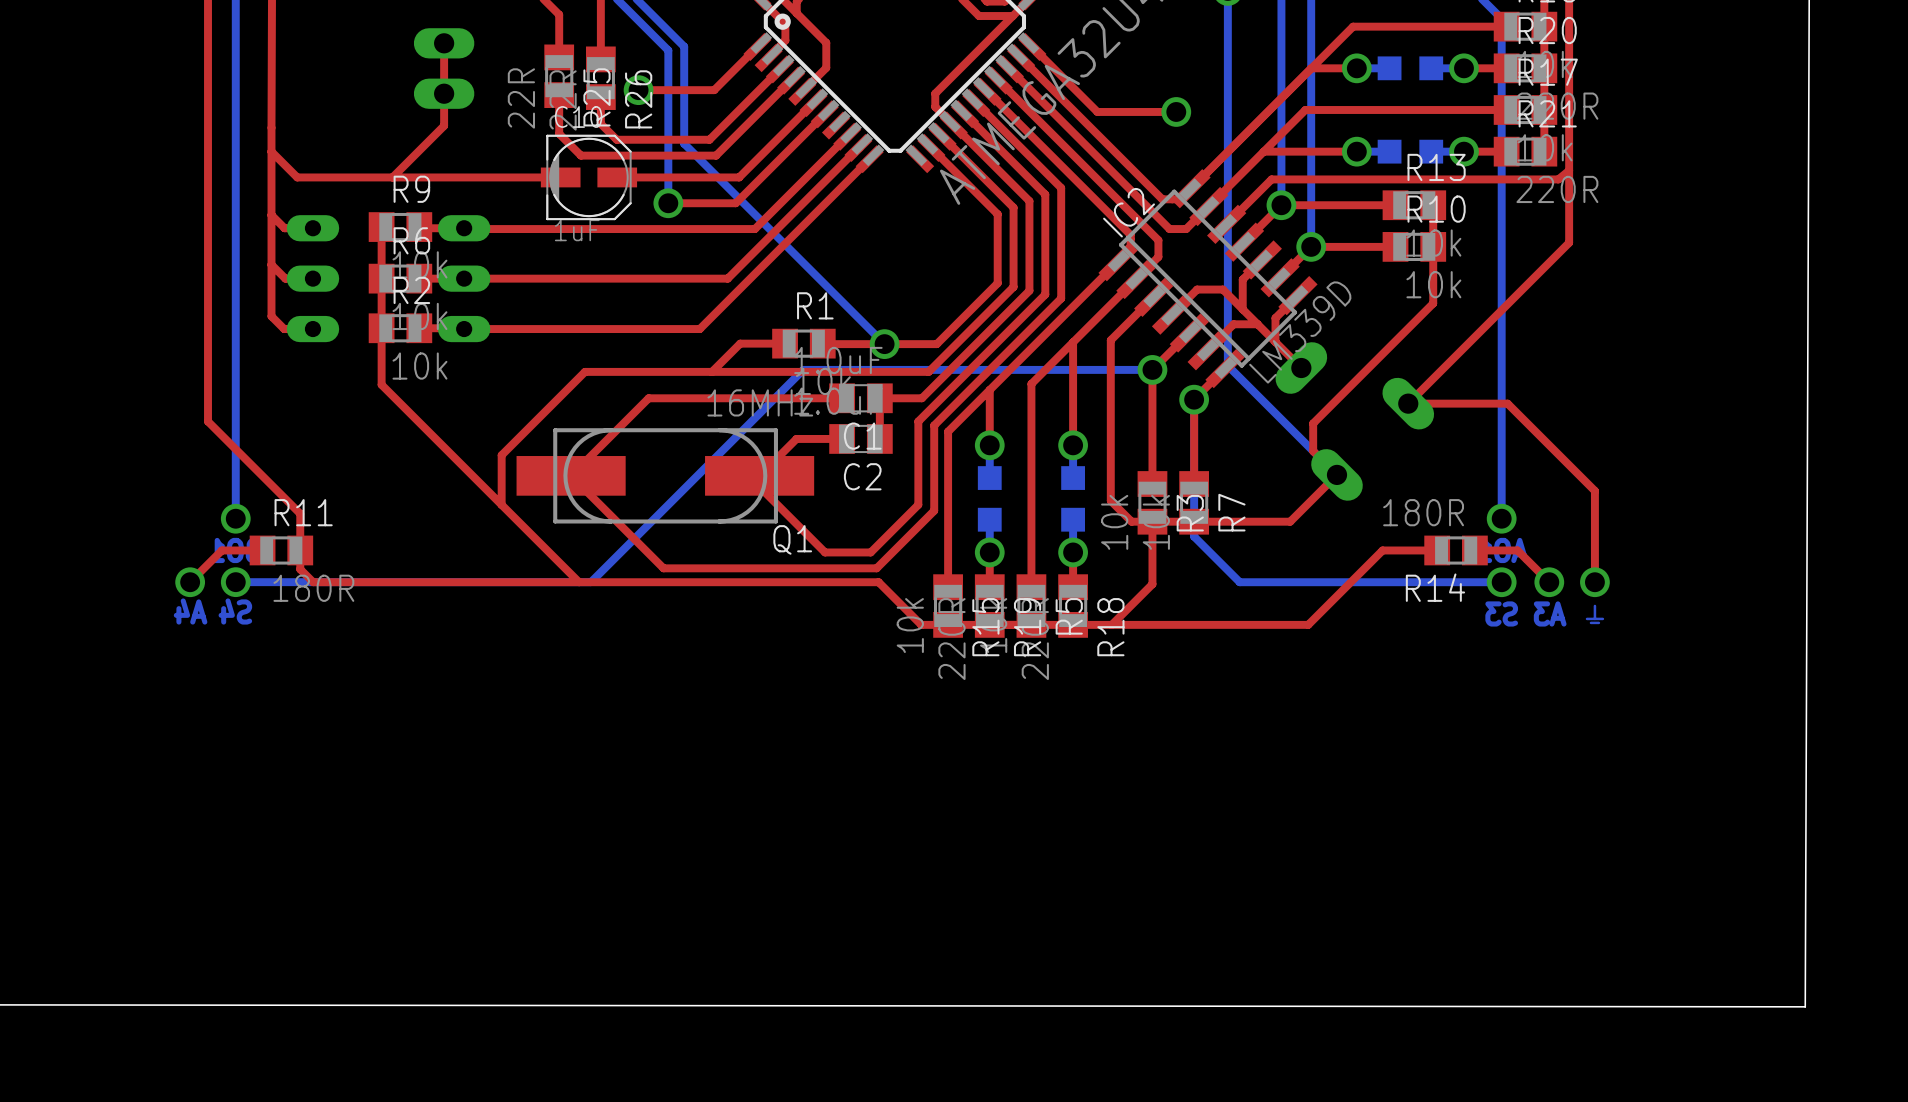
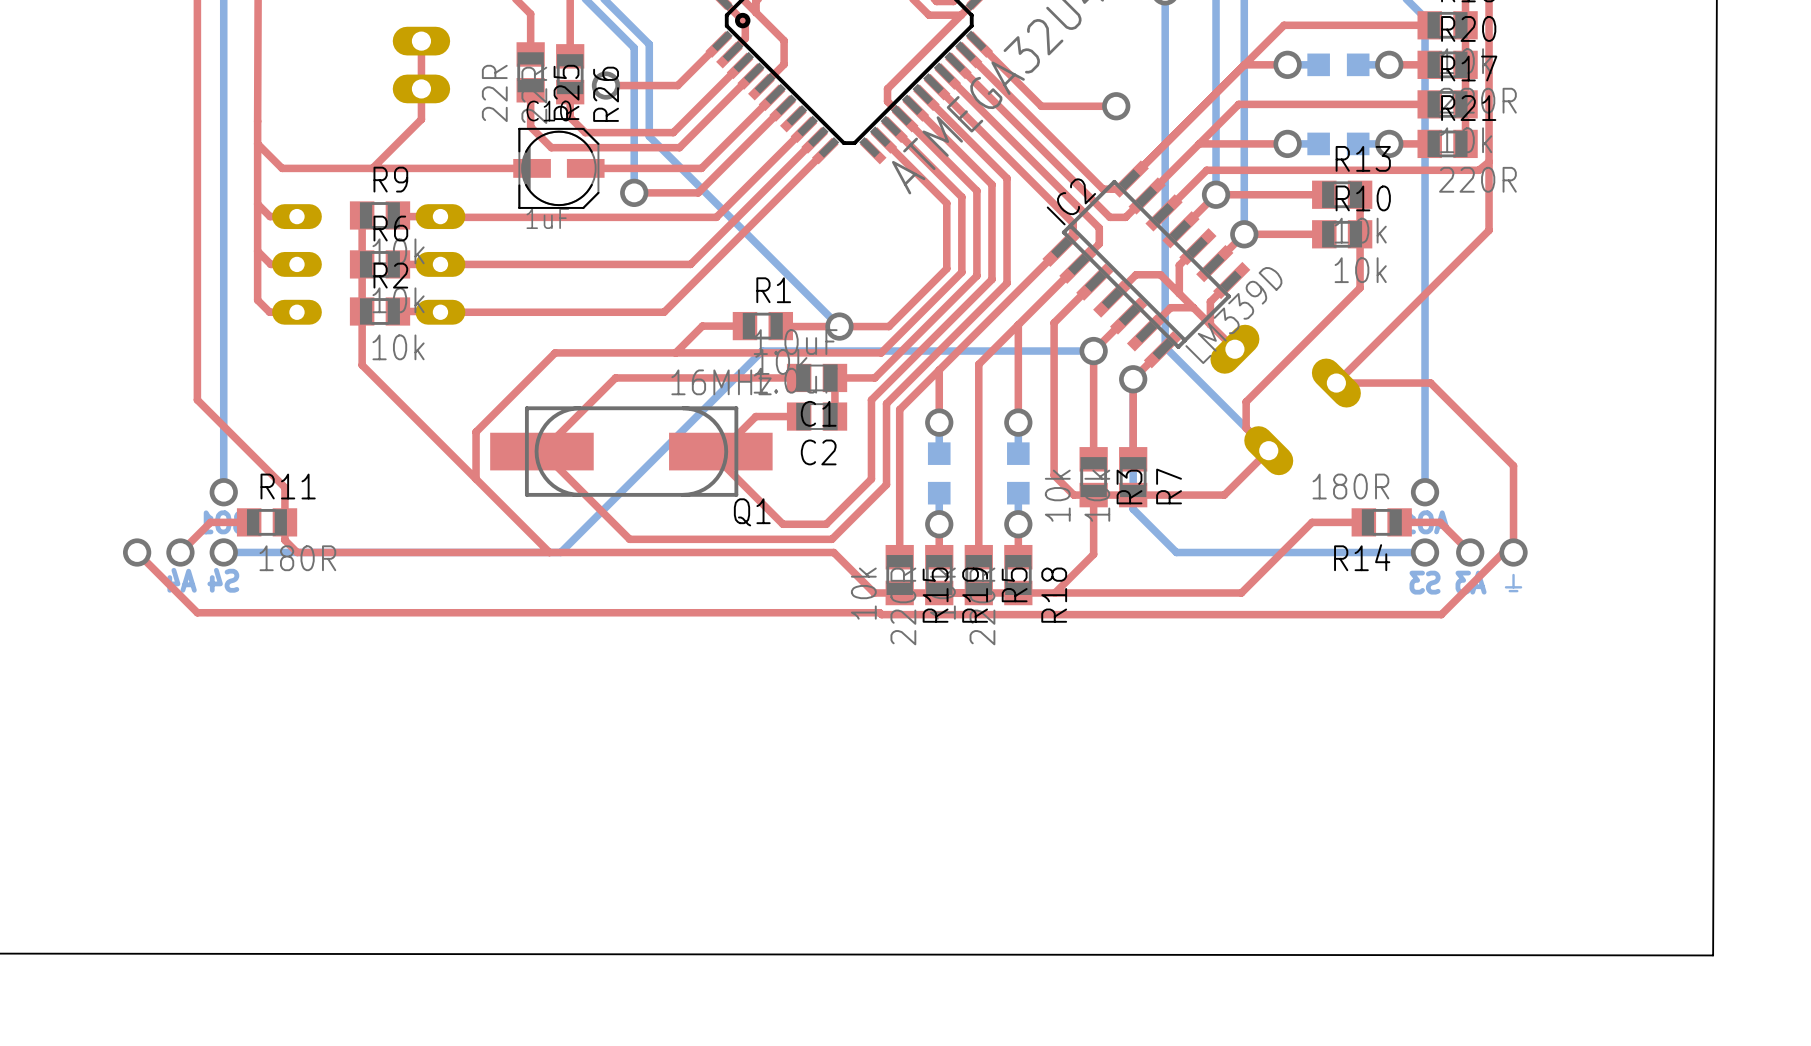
top track: none -> (137, 552) (197, 612) (879, 612) (881, 614) (1441, 614) (1503, 552) (1513, 552)
via: none -> (137, 552)

